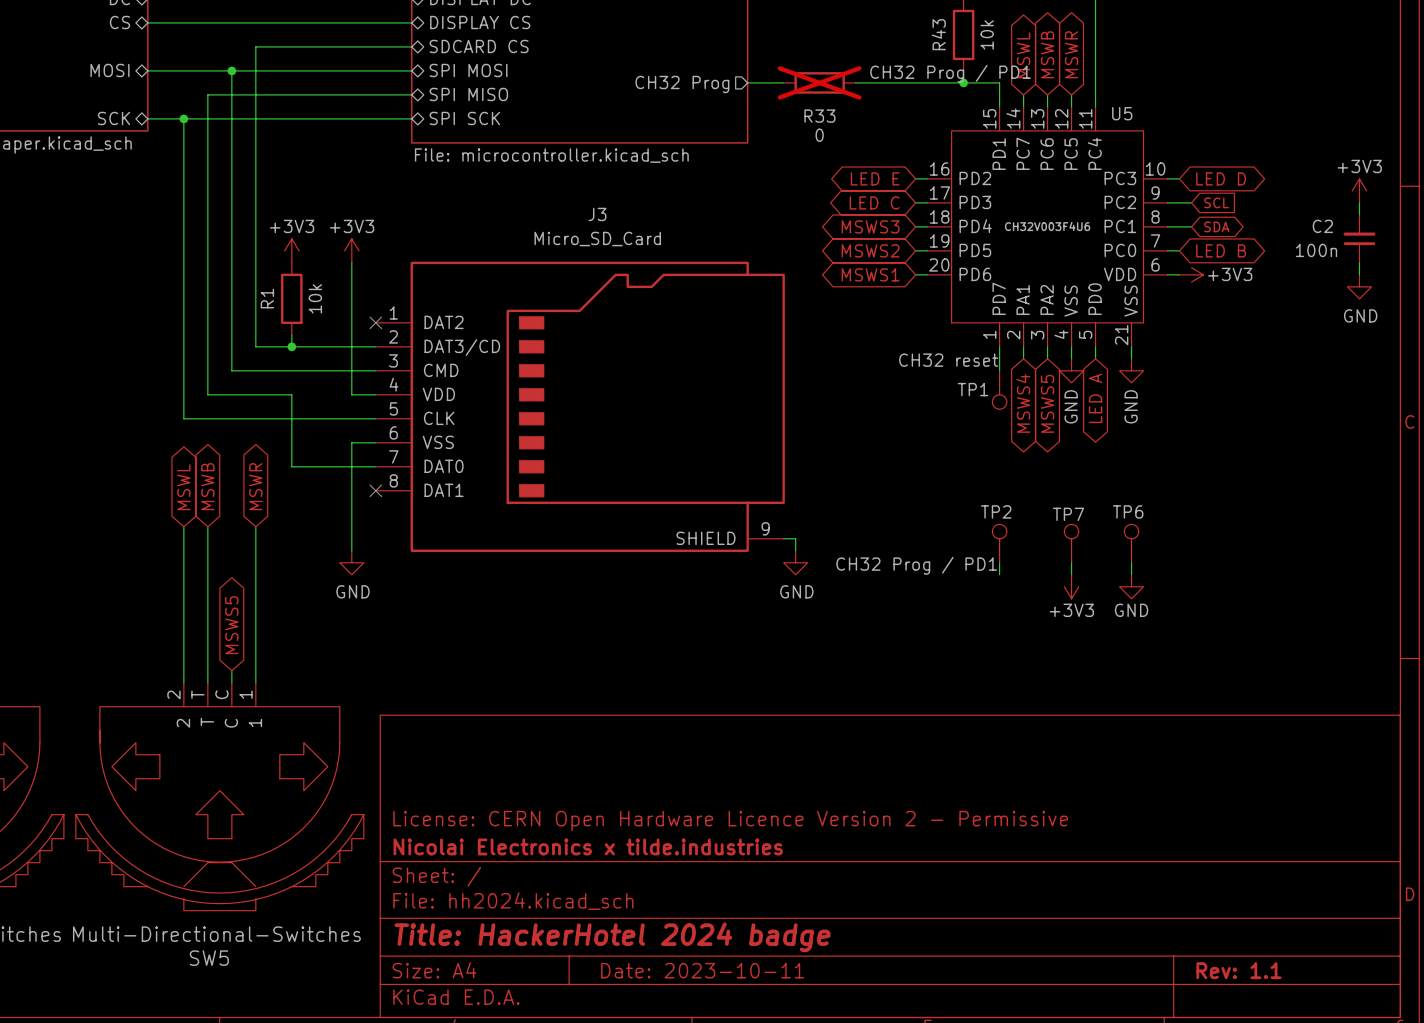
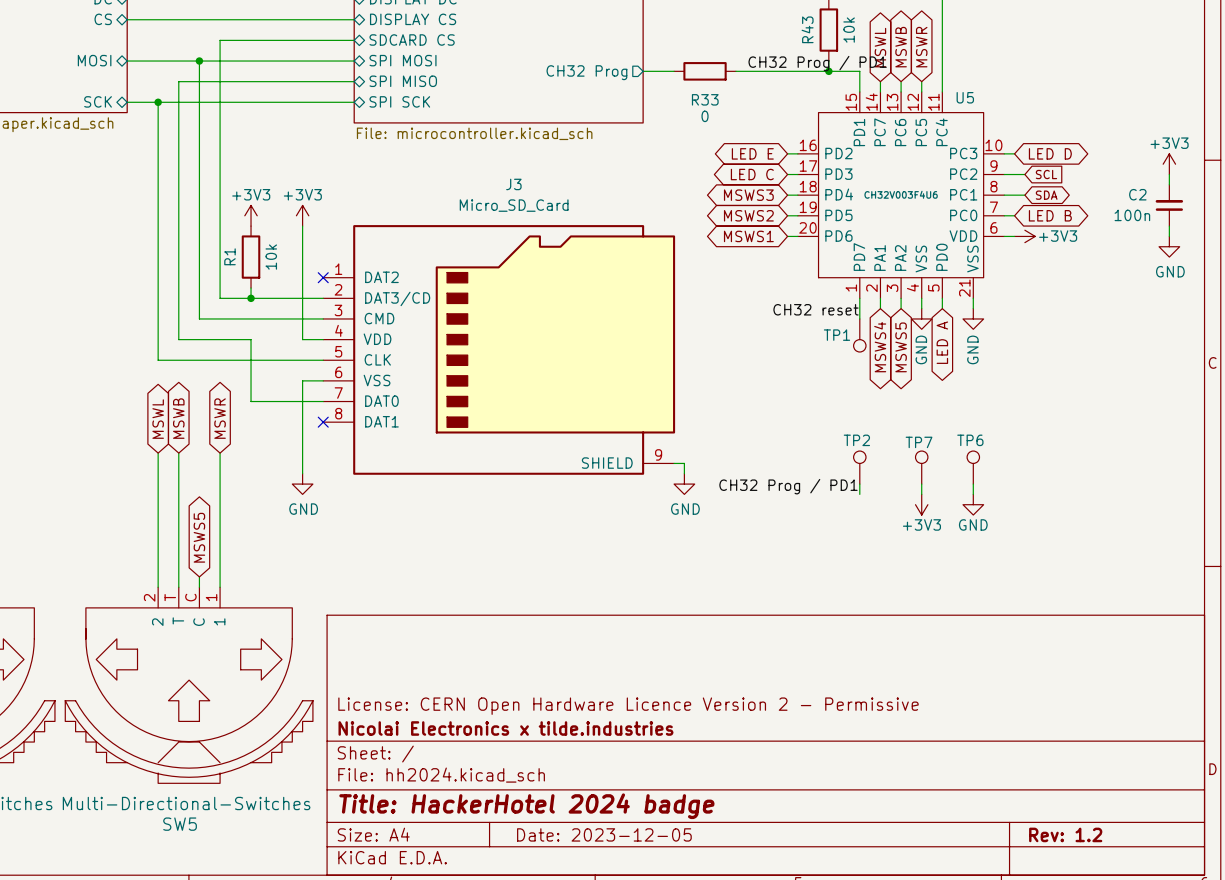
R33 do-not-place cross: (819, 82) -> none
title block: Date: 2023-10-11 (702, 970) -> Date: 2023-12-05 (604, 834)
title block: Rev: 1.1 (1238, 970) -> Rev: 1.2 (1065, 834)

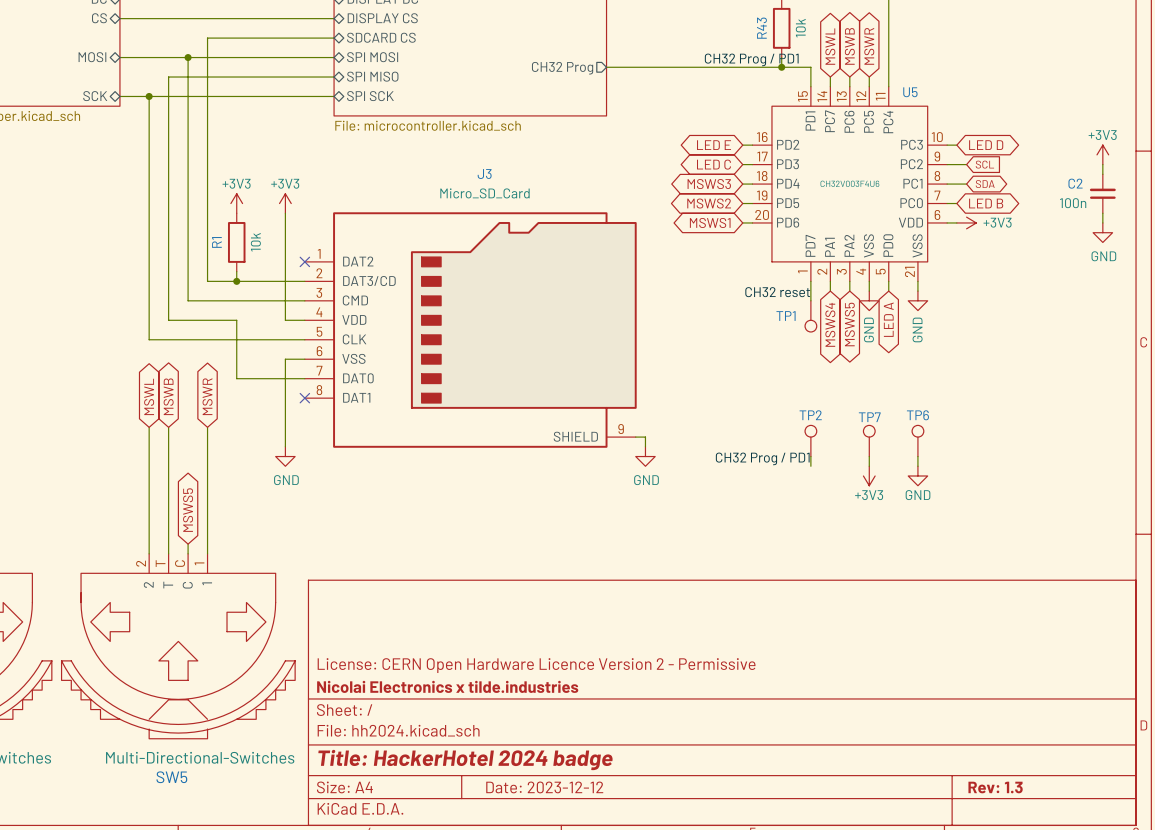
wire: none -> (635, 67) (694, 67)
R33: 0 (705, 71) -> none
title block: Date: 2023-12-05 (604, 834) -> Date: 2023-12-12 (544, 787)
title block: Rev: 1.2 (1065, 834) -> Rev: 1.3 (995, 787)

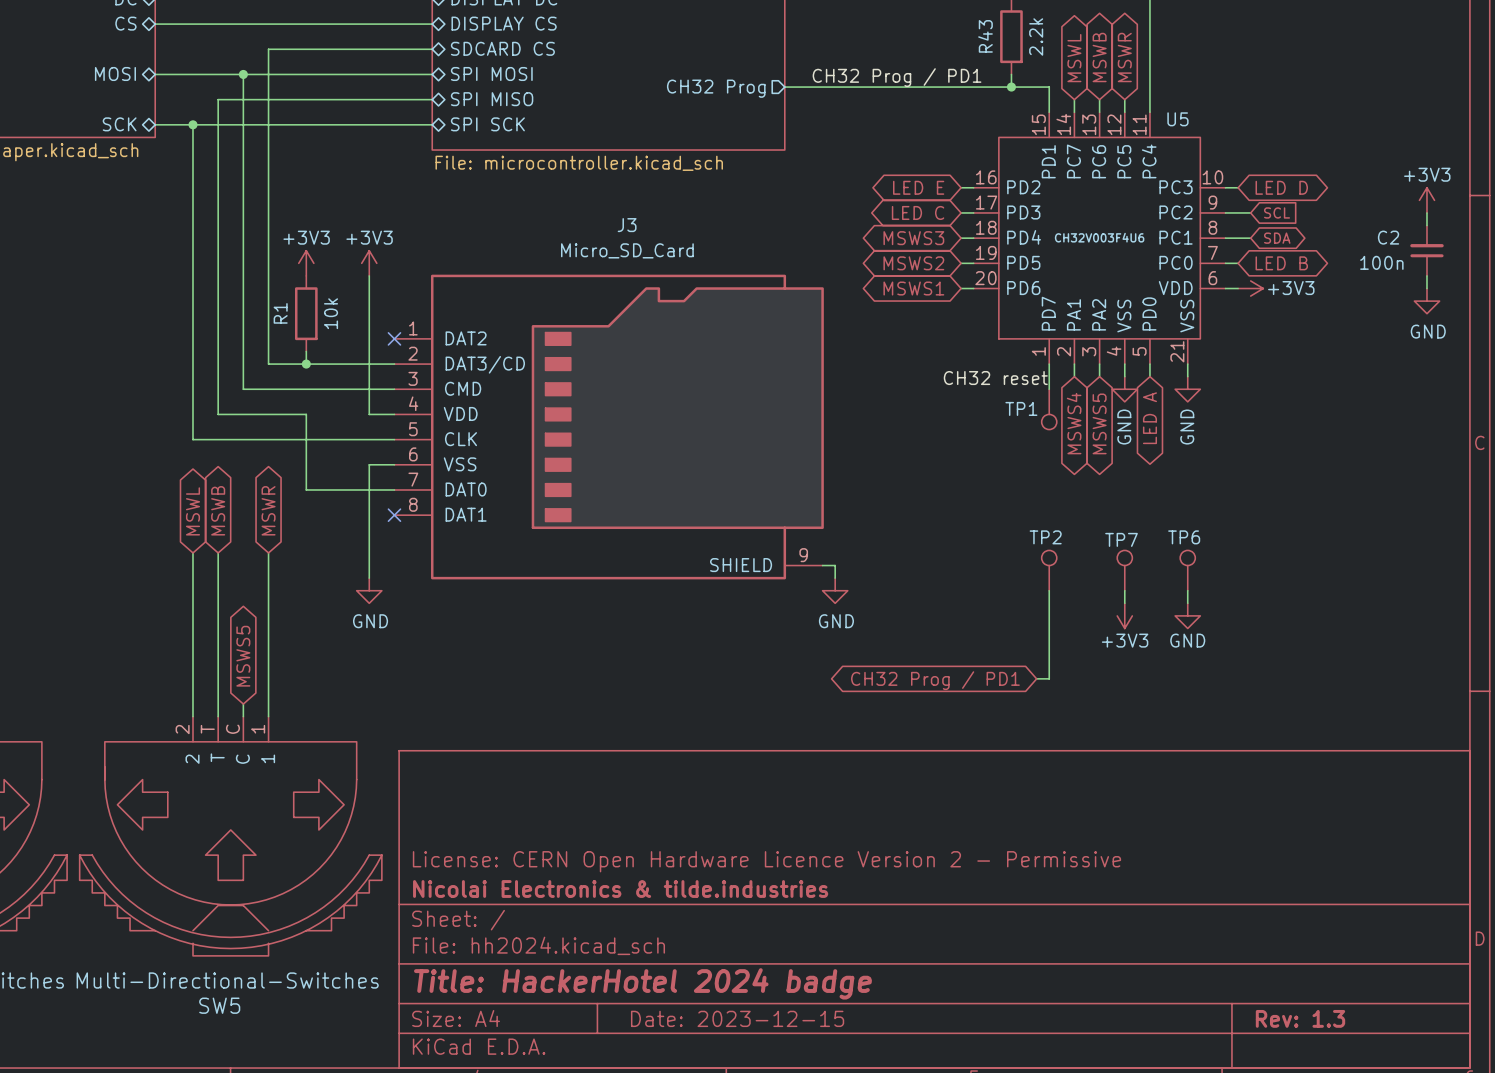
R43 value: 10k (800, 28) -> 2.2k (1036, 36)
label position: CH32 Prog / PD1 (751, 59) -> CH32 Prog / PD1 (897, 77)
label: CH32 Prog / PD1 (762, 458) -> none
wire: none -> (1049, 603) (1049, 678) (1036, 678)
global label: none -> CH32 Prog / PD1 (935, 680)
title block: Nicolai Electronics x tilde.industries (447, 686) -> Nicolai Electronics & tilde.industries (620, 889)
title block: Date: 2023-12-12 (544, 787) -> Date: 2023-12-15 (737, 1018)

